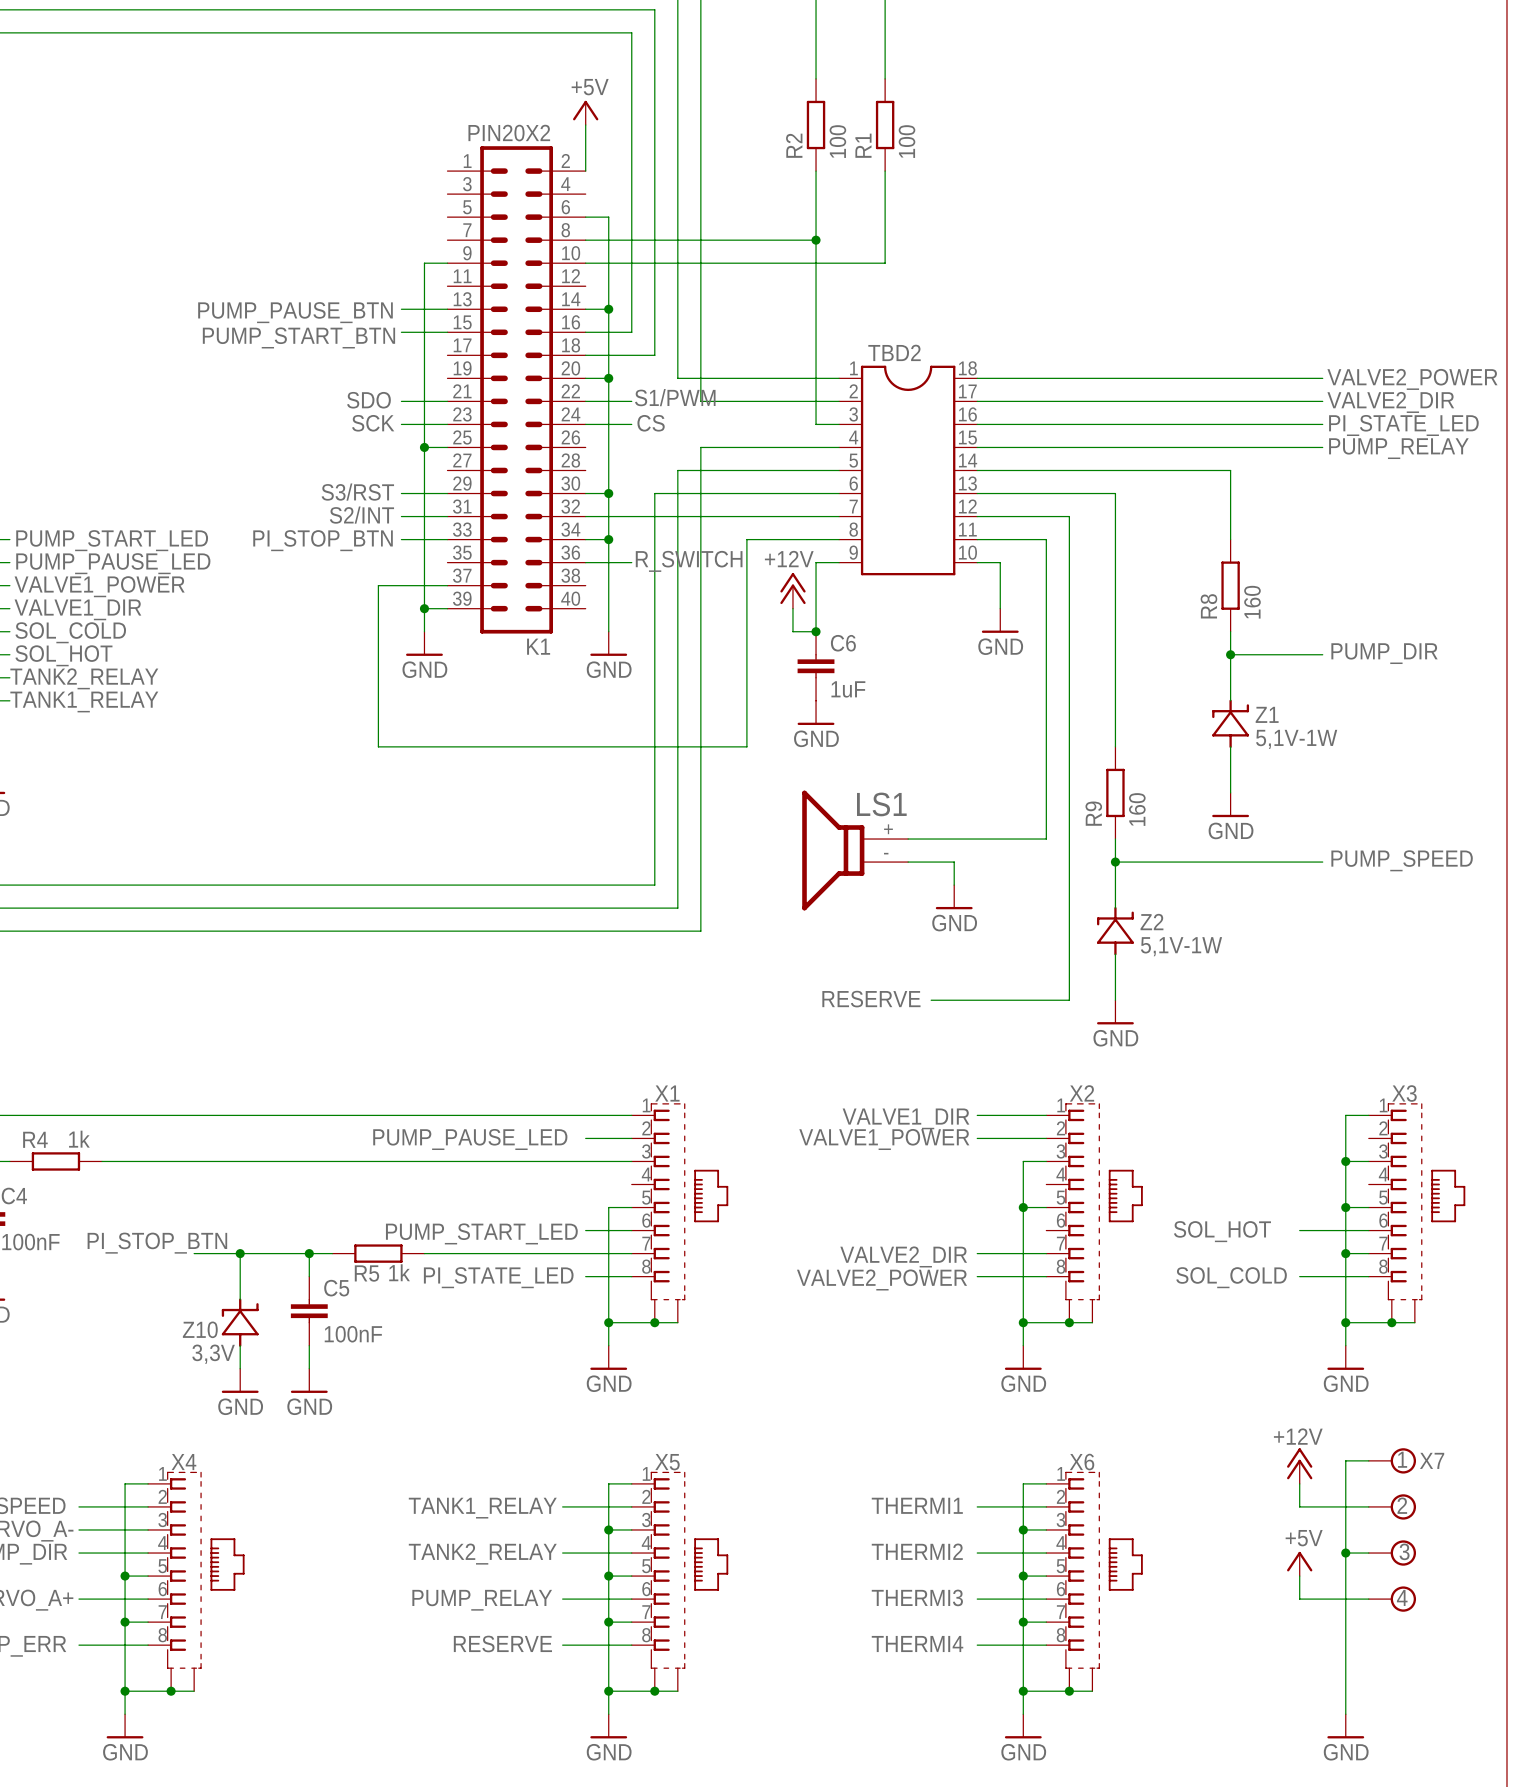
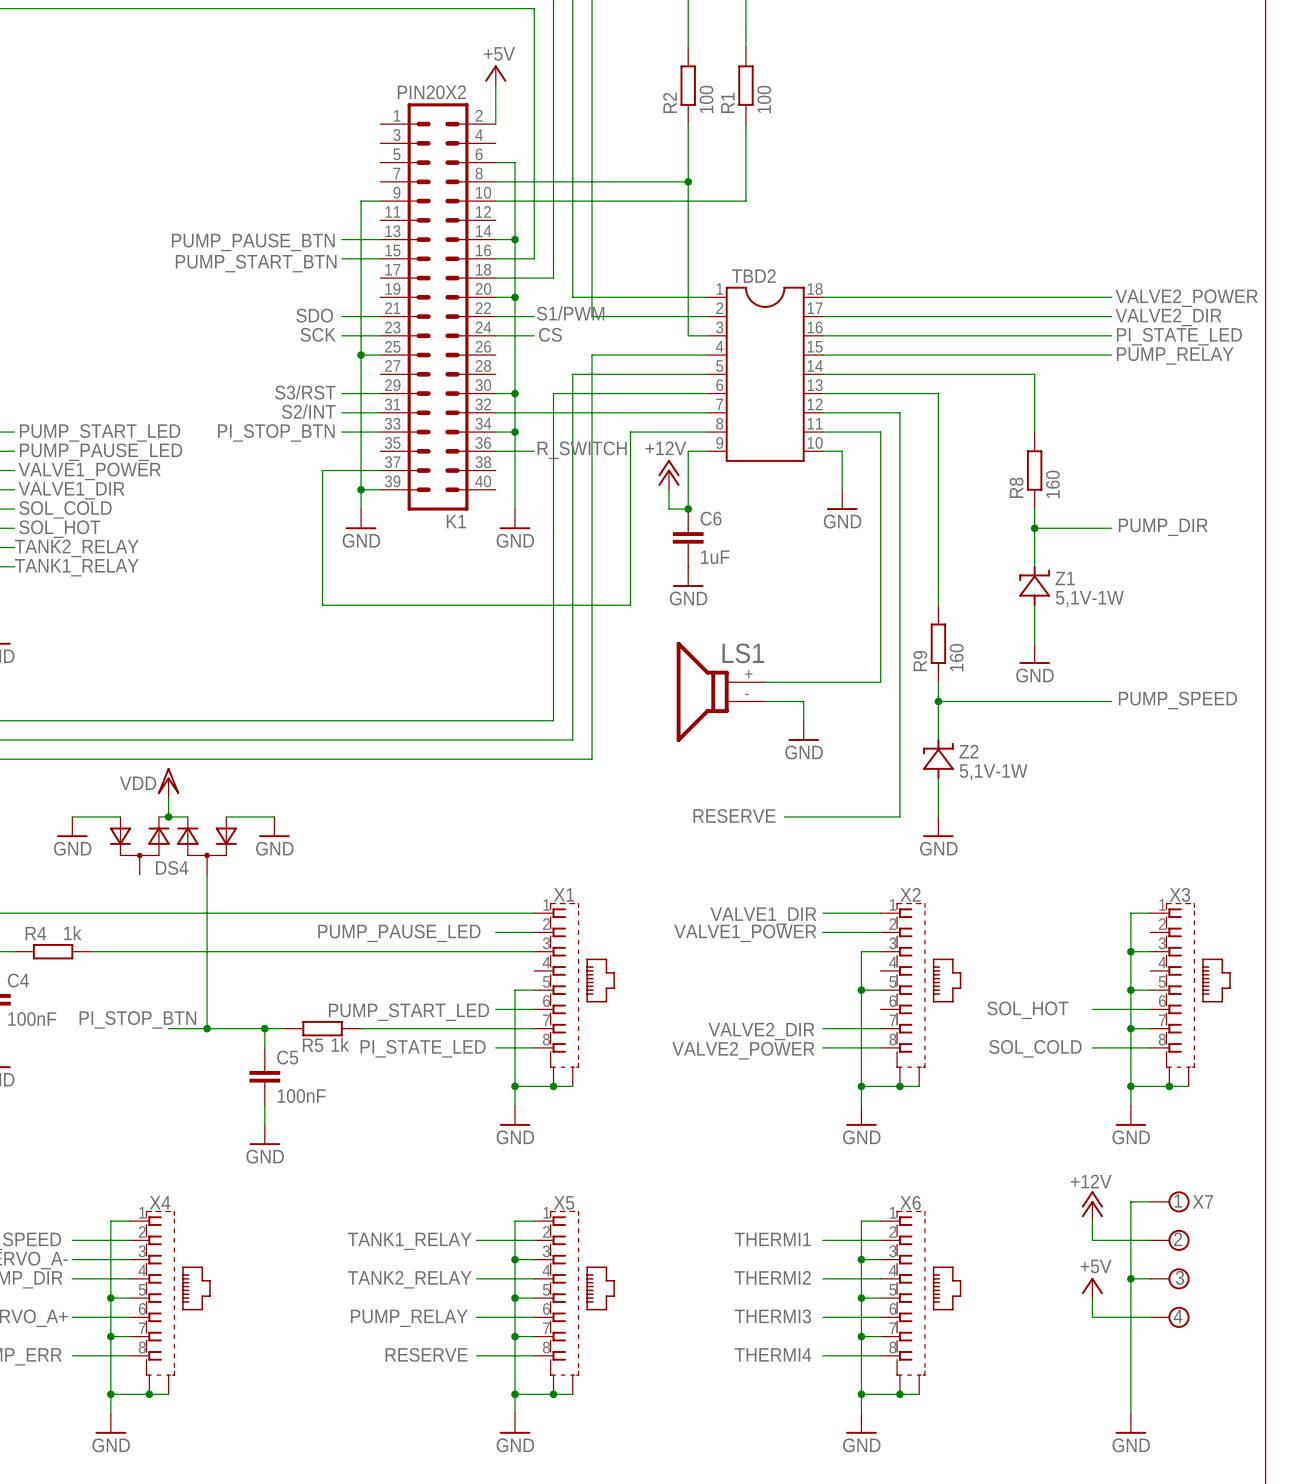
power symbol: none -> VDD (168, 782)
wire: none -> (168, 797) (168, 816)
wire: none -> (72, 816) (120, 816)
wire: none -> (158, 816) (187, 816)
junction: none -> (168, 816)
wire: none -> (226, 816) (274, 816)
power symbol: none -> GND (72, 827)
power symbol: none -> GND (274, 827)
DS4: none -> (173, 845)
wire: (240, 1253) (240, 1299) -> (207, 1028) (207, 874)
Z10: 3,3V (240, 1322) -> none
wire: (240, 1345) (240, 1368) -> none
power symbol: GND (240, 1380) -> none

